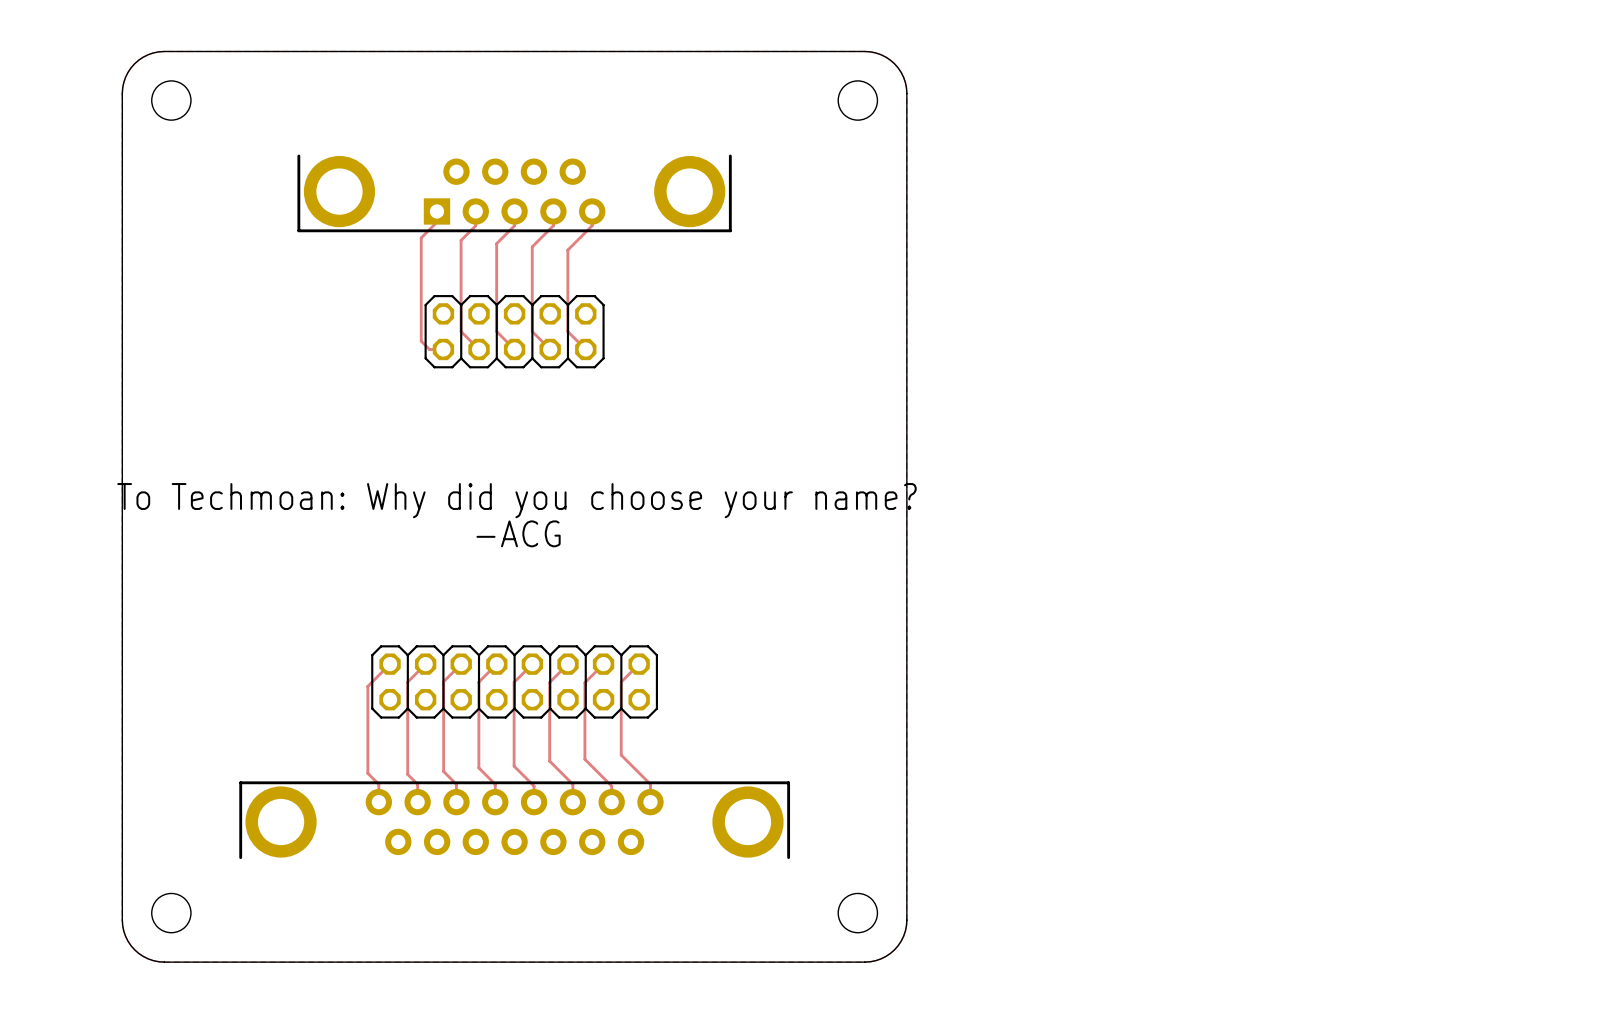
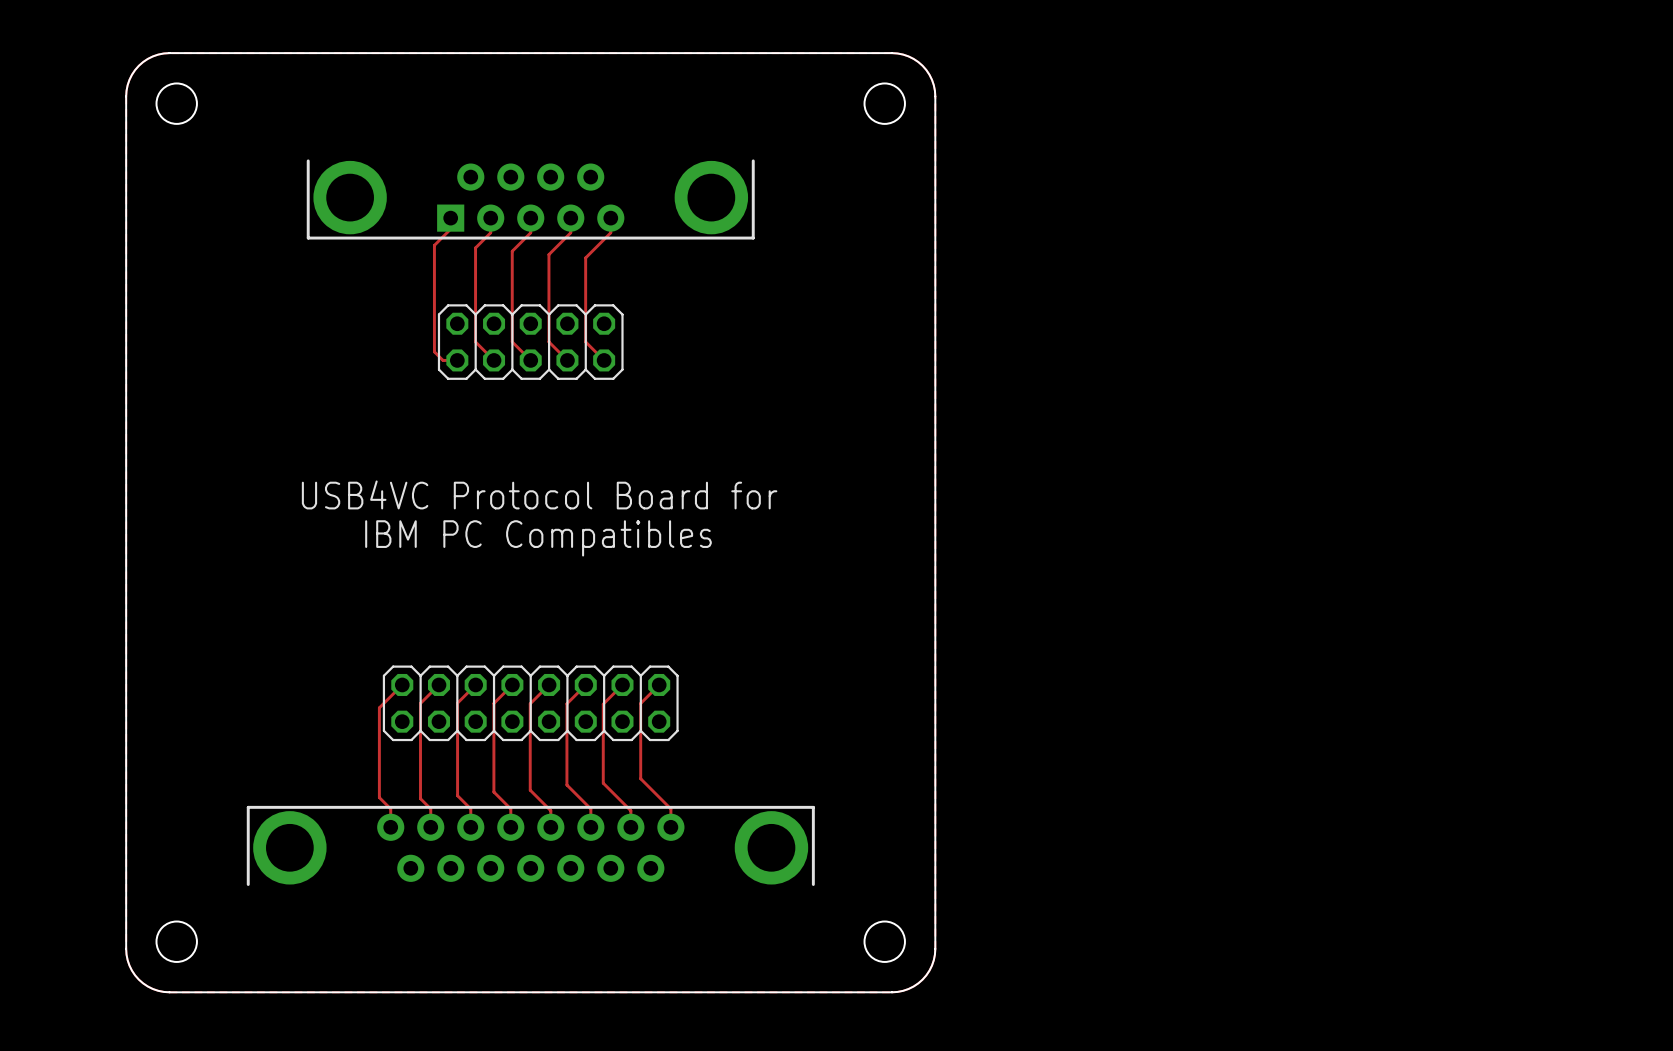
text: none -> USB4VC Protocol Board for (539, 494)
text: To Techmoan: Why did you choose your name? (516, 500) -> none
text: none -> IBM PC Compatibles (538, 538)
text: -ACG (518, 533) -> none

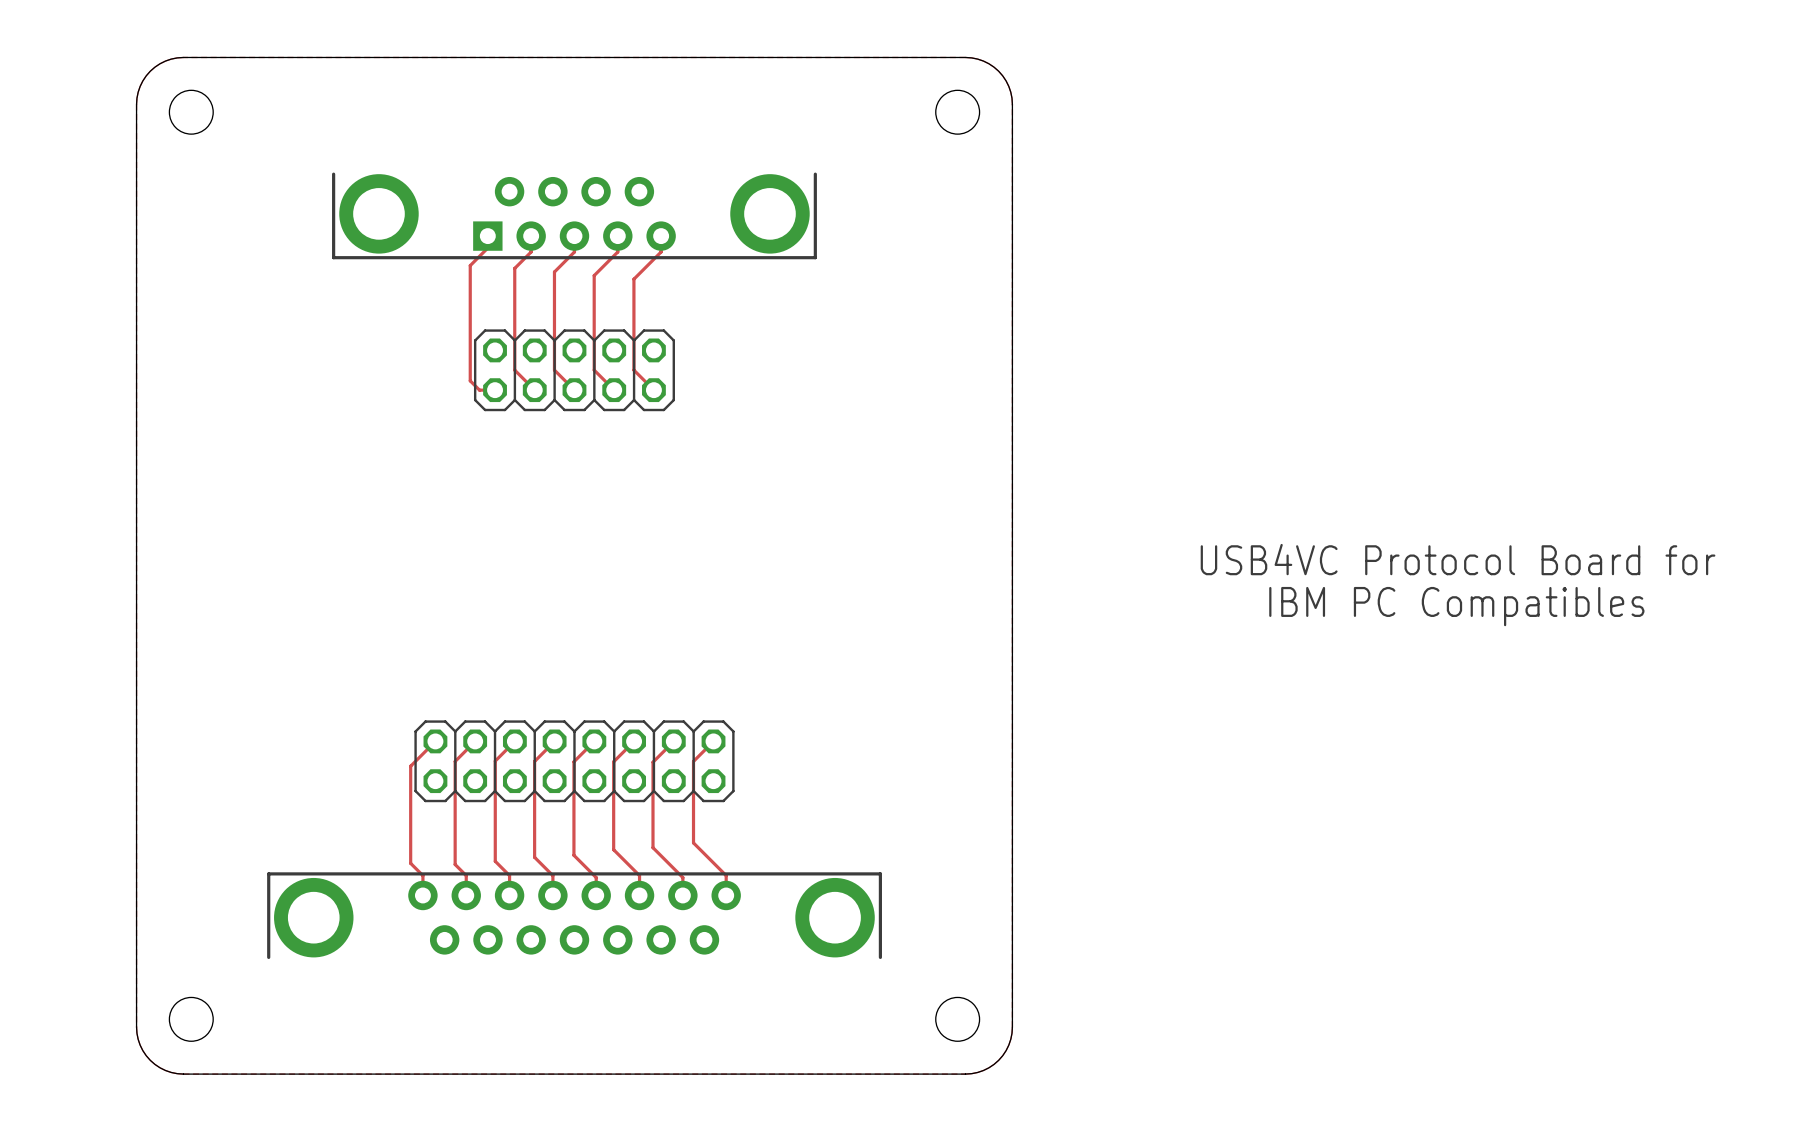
text: USB4VC Protocol Board for (539, 494) -> none
text: none -> USB4VC Protocol Board for (1458, 559)
text: IBM PC Compatibles (538, 538) -> none
text: none -> IBM PC Compatibles (1456, 606)

